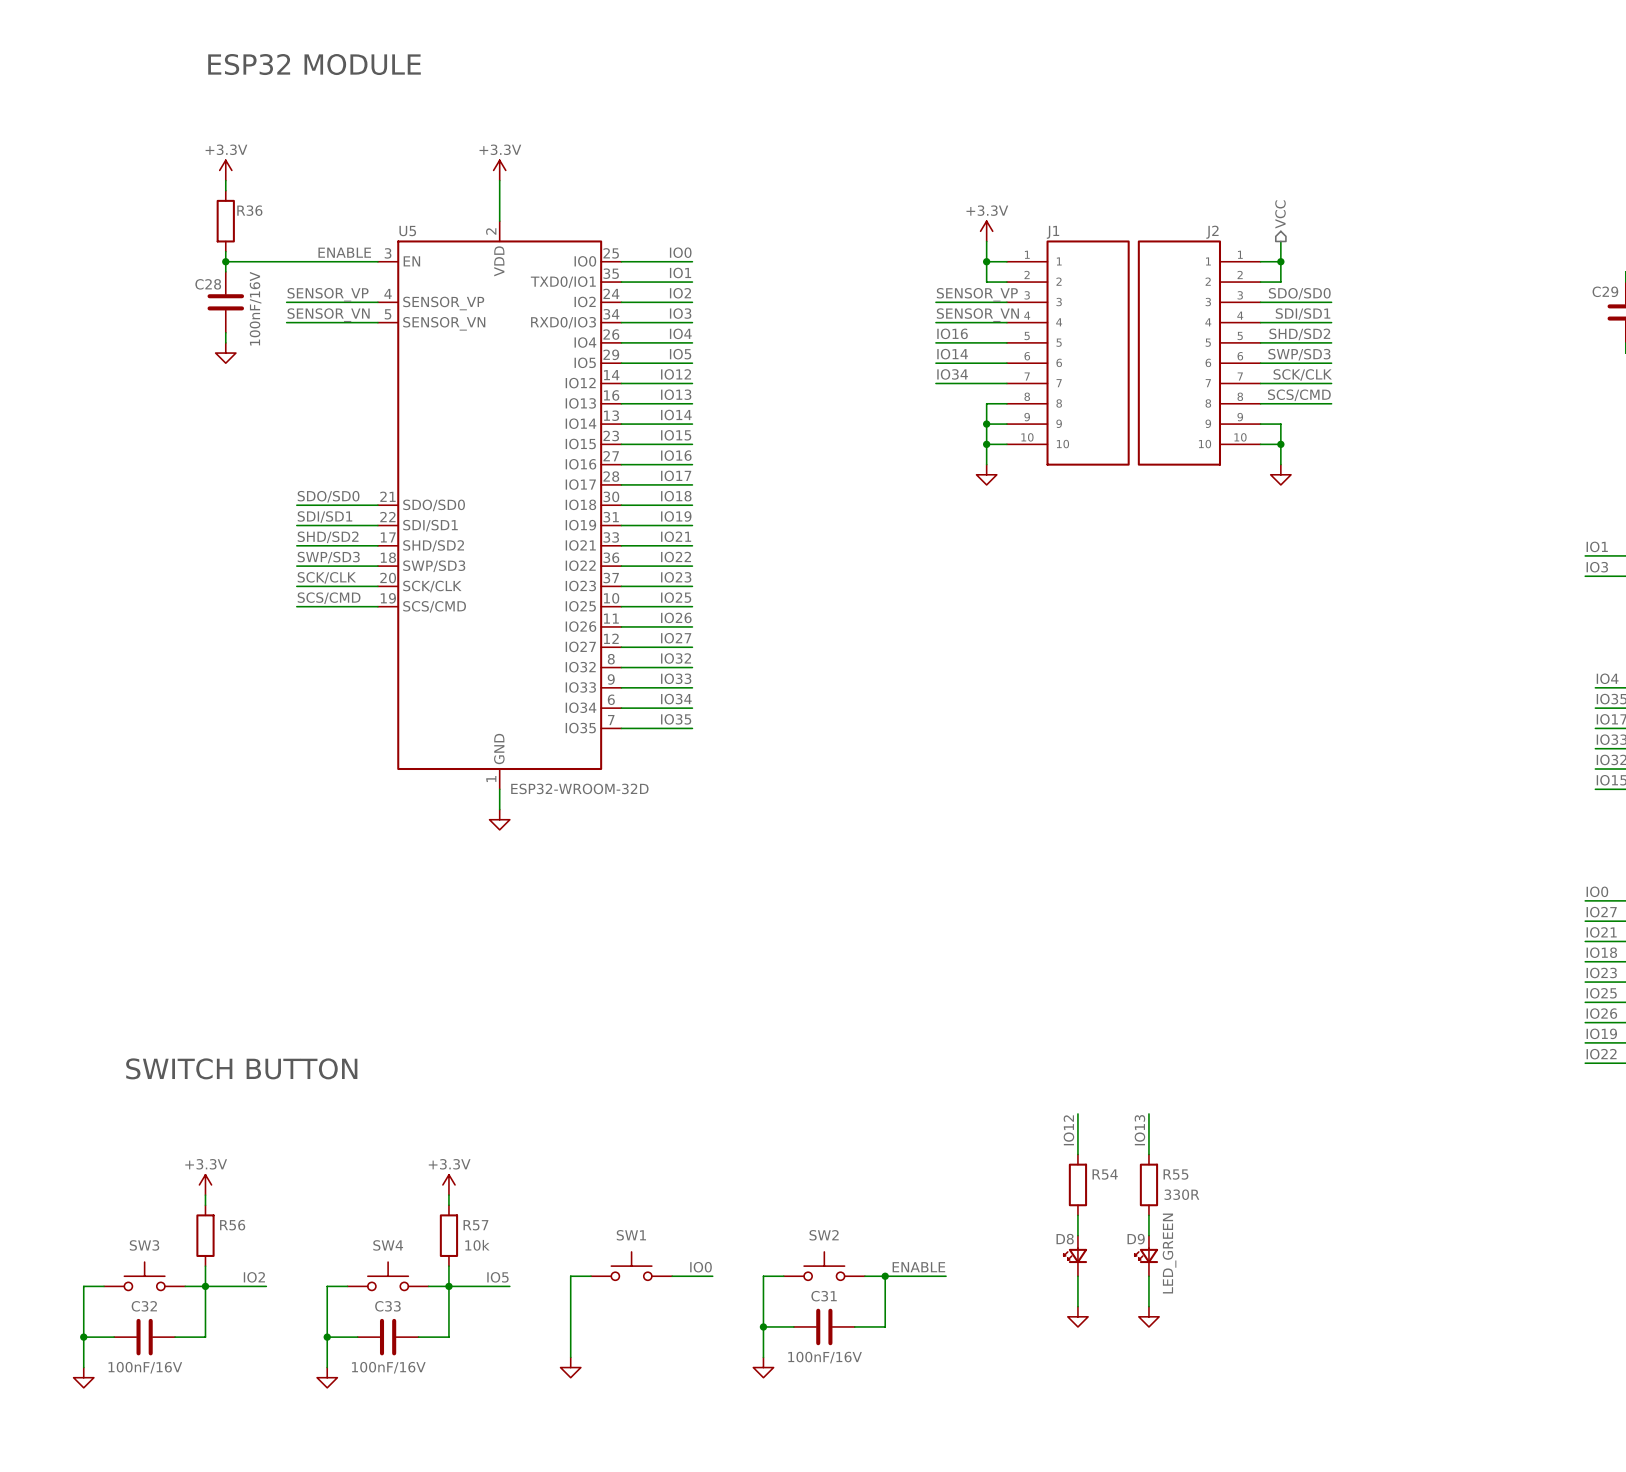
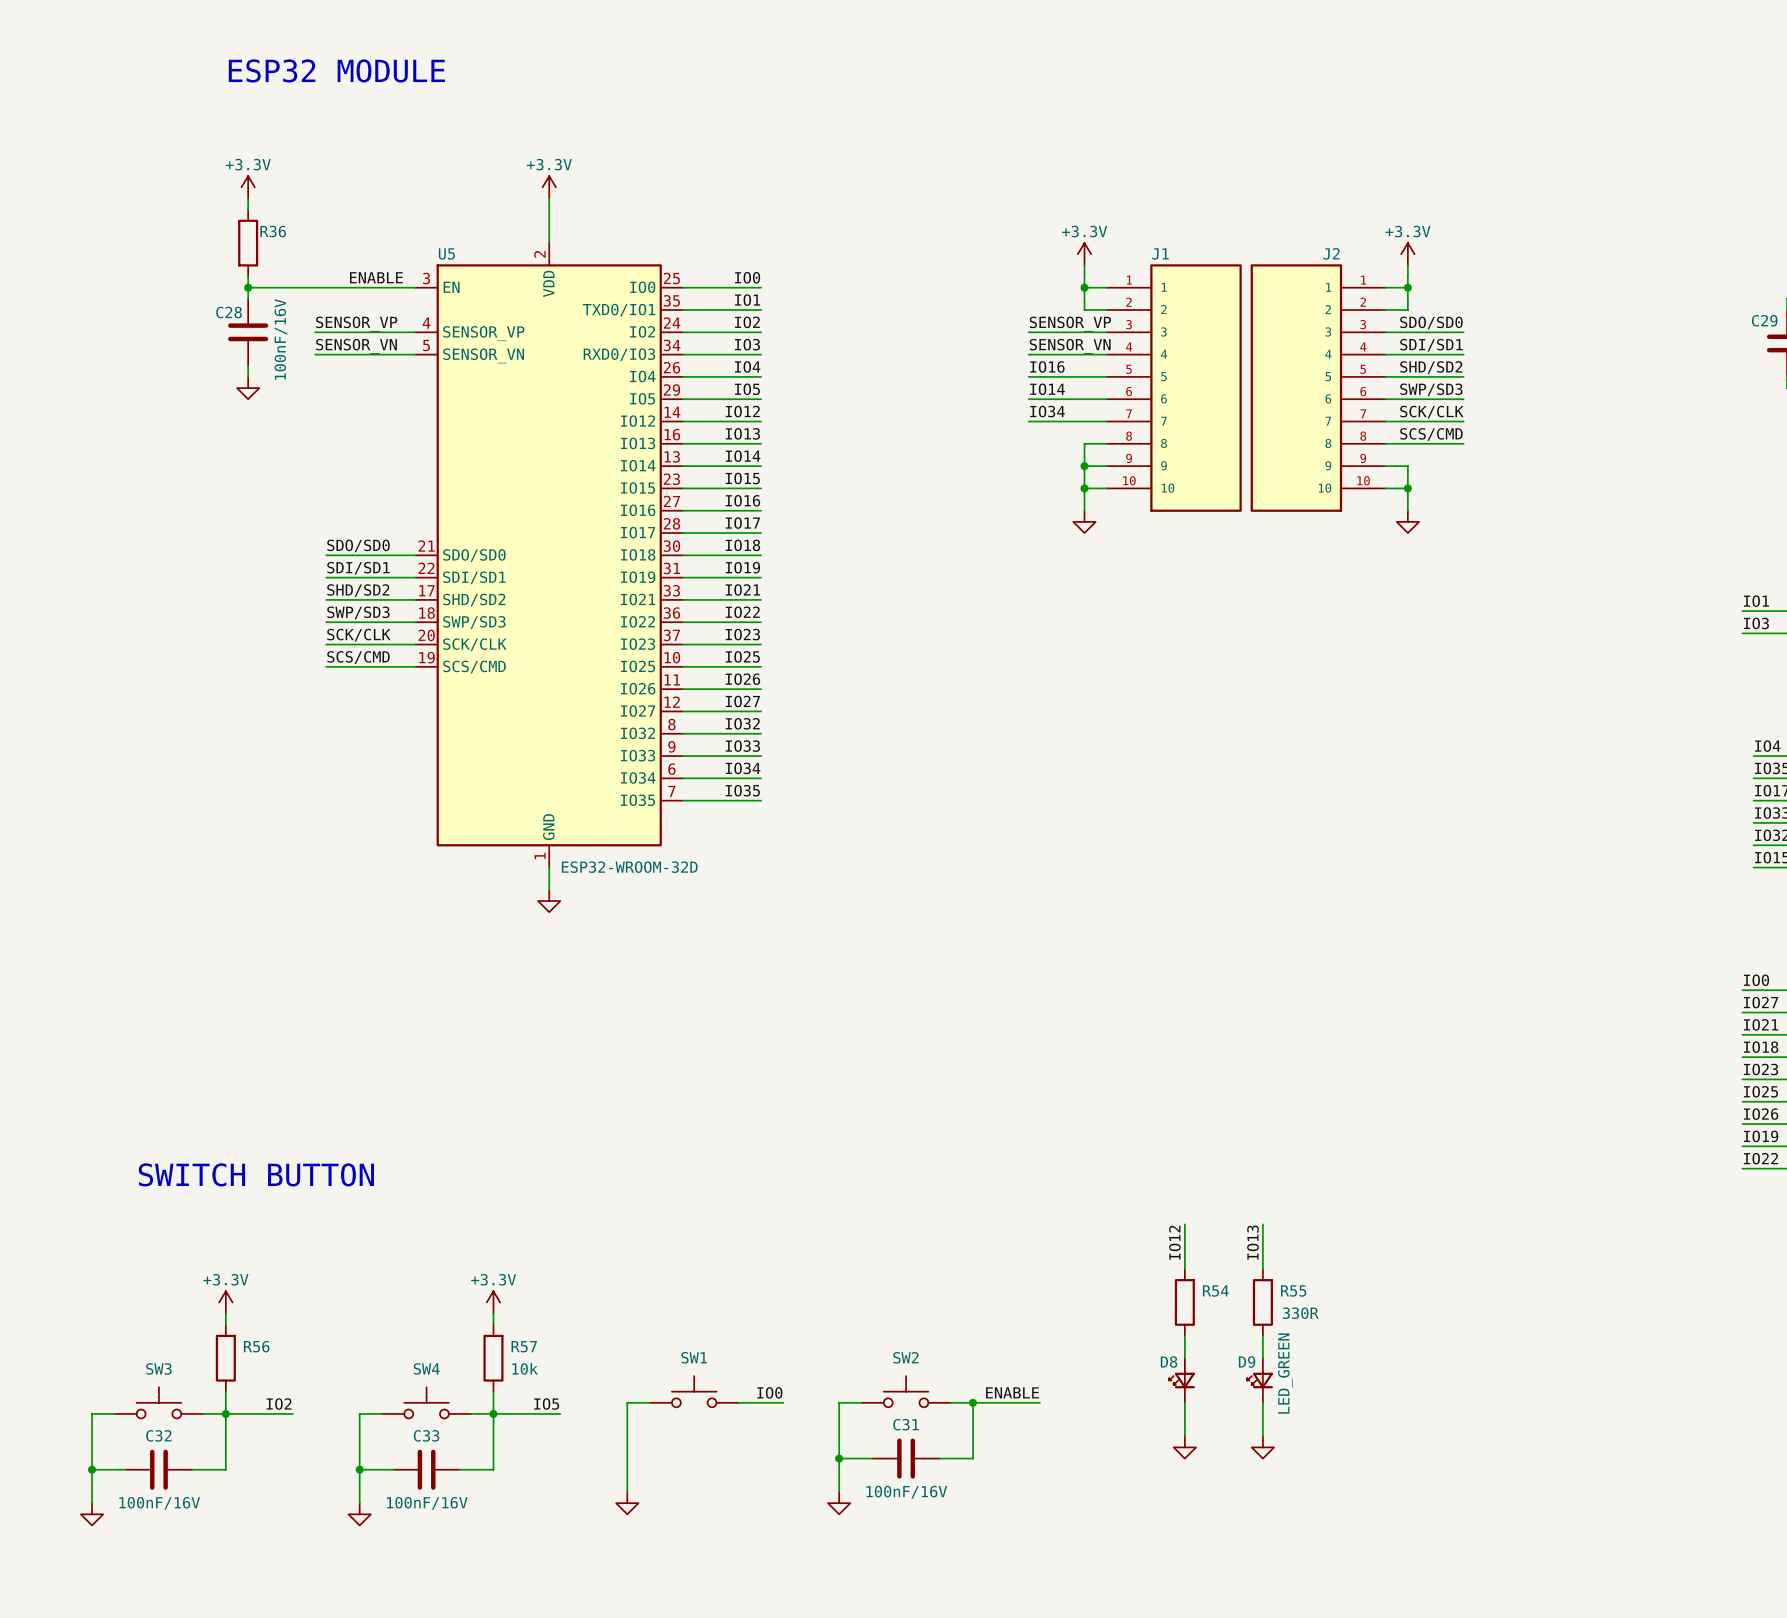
hierarchical label: VCC (1280, 214) -> none
power symbol: none -> +3.3V (1407, 254)

